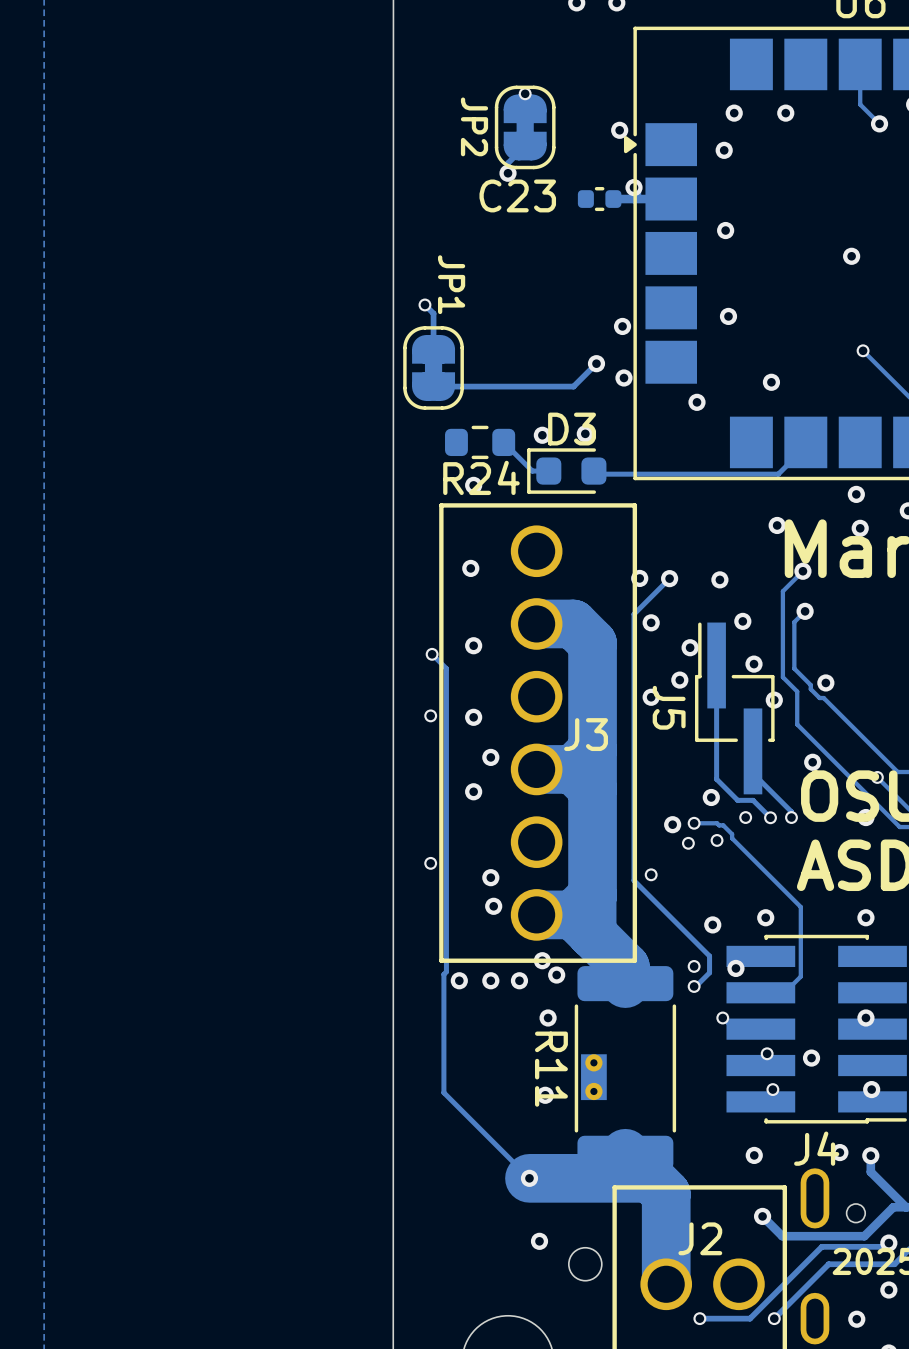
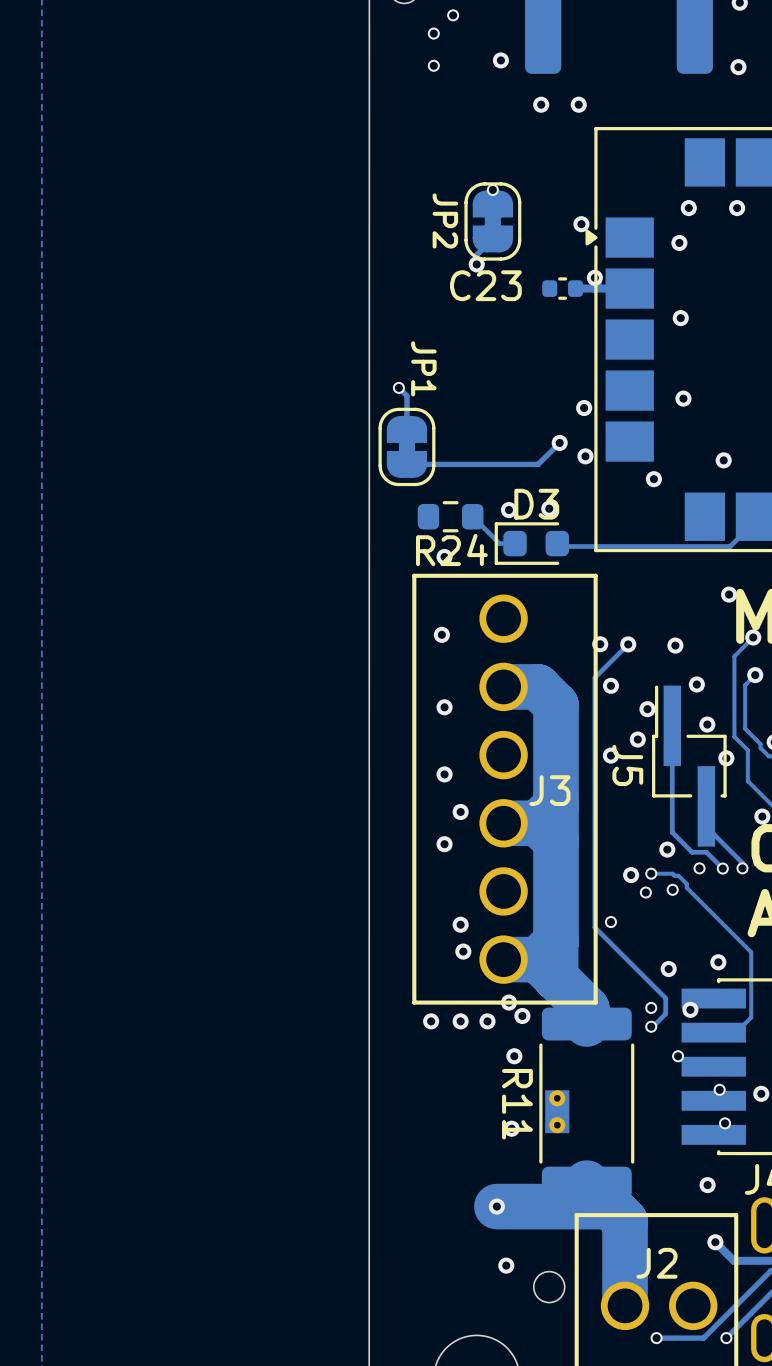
track: (432, 654) (446, 668) (446, 971) (443, 974) (443, 1092) (529, 1178) -> none
via: (432, 654) -> none
via: (430, 715) -> none
via: (430, 863) -> none

